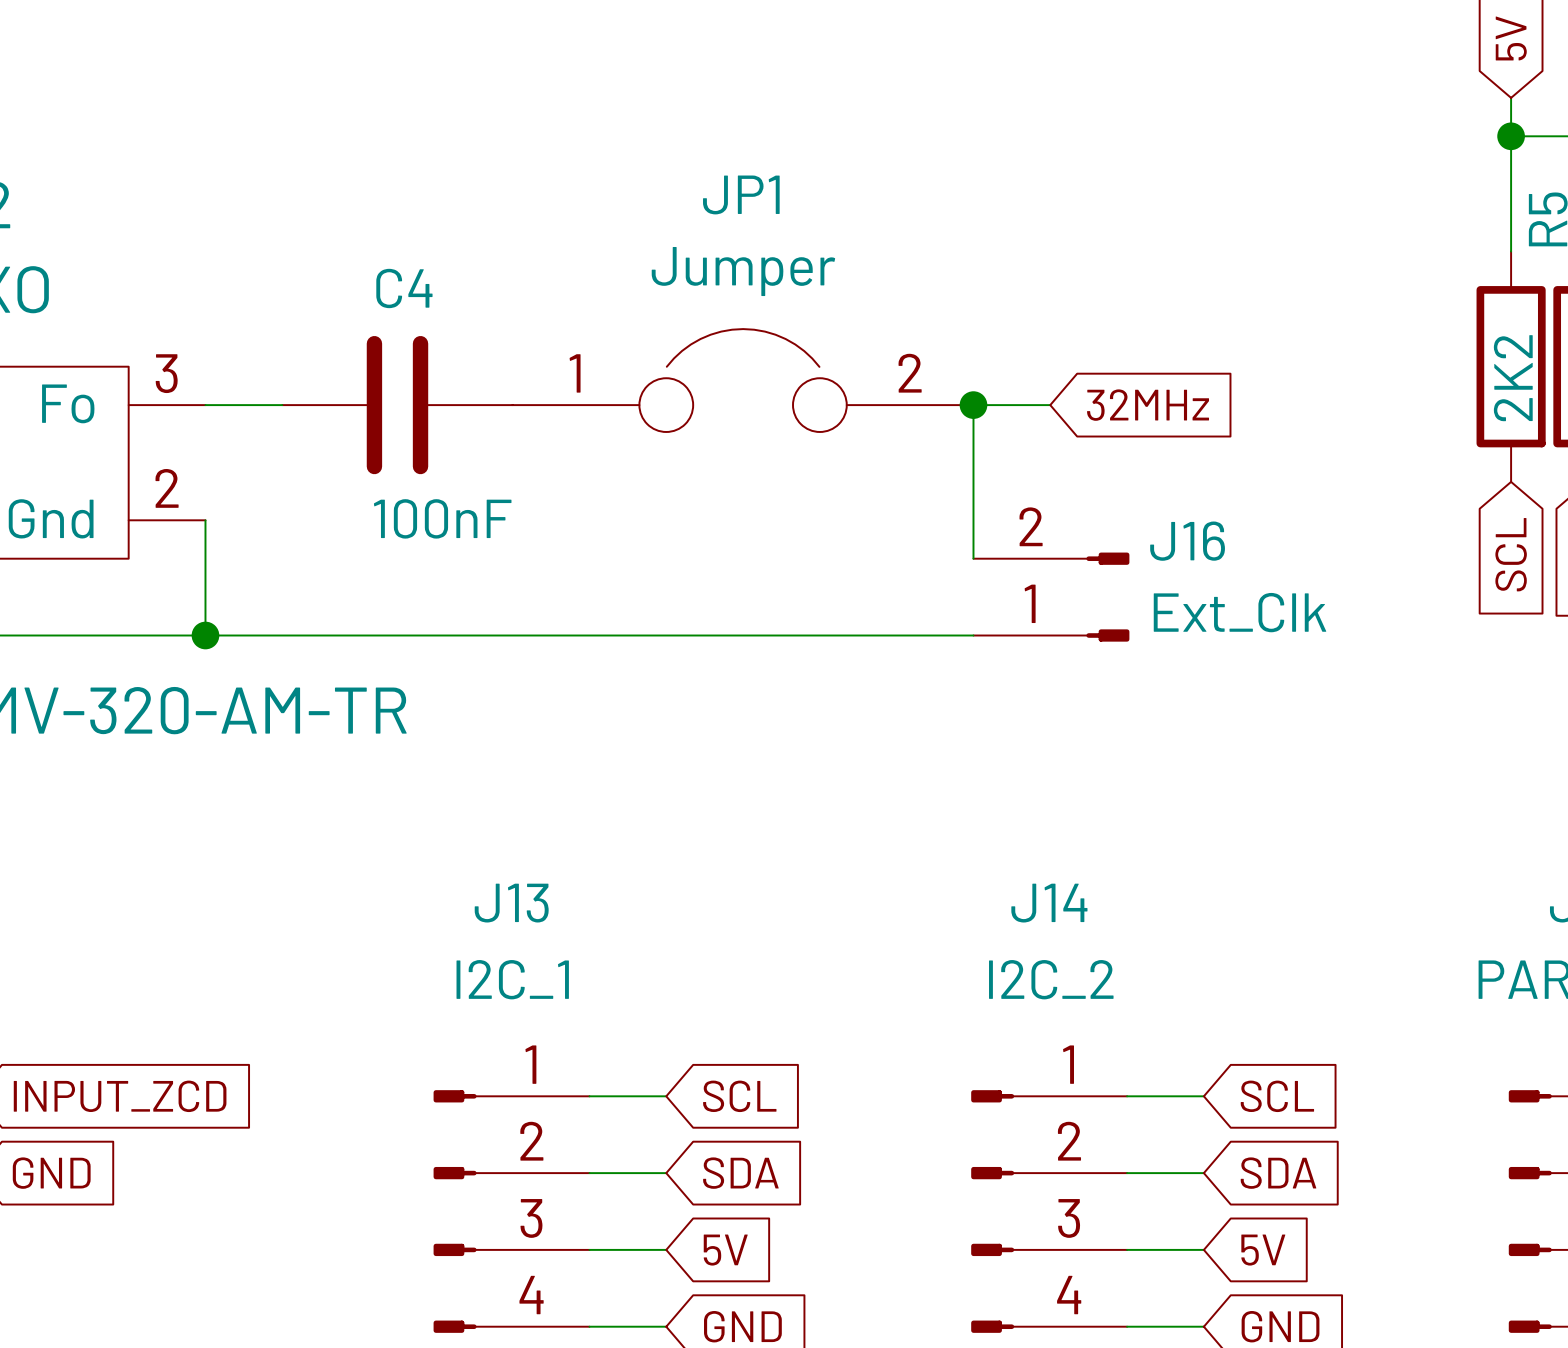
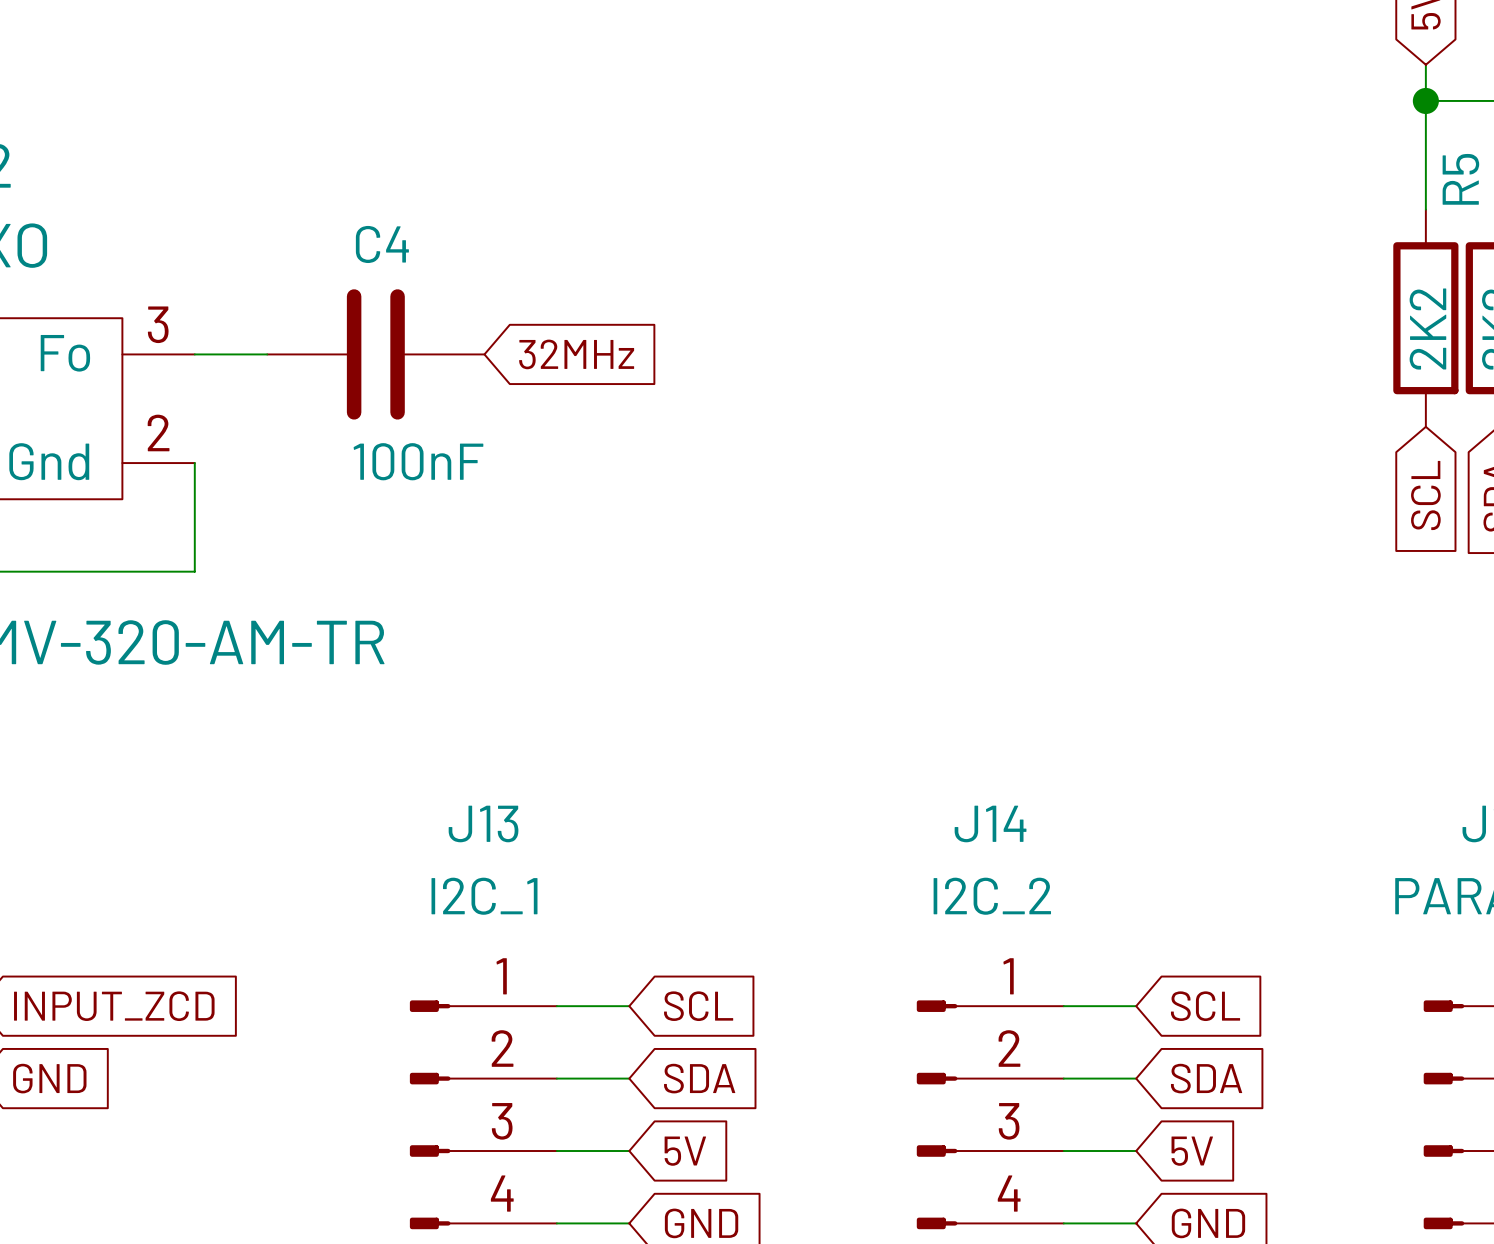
JP1: Jumper (743, 380) -> none
junction: (973, 405) -> none
wire: (1050, 405) (973, 405) (973, 558) -> none
global label position: 32MHz (1148, 405) -> 32MHz (576, 354)
J16: Ext_Clk (1051, 597) -> none
wire: (205, 635) (973, 635) -> none
junction: (205, 635) -> none

